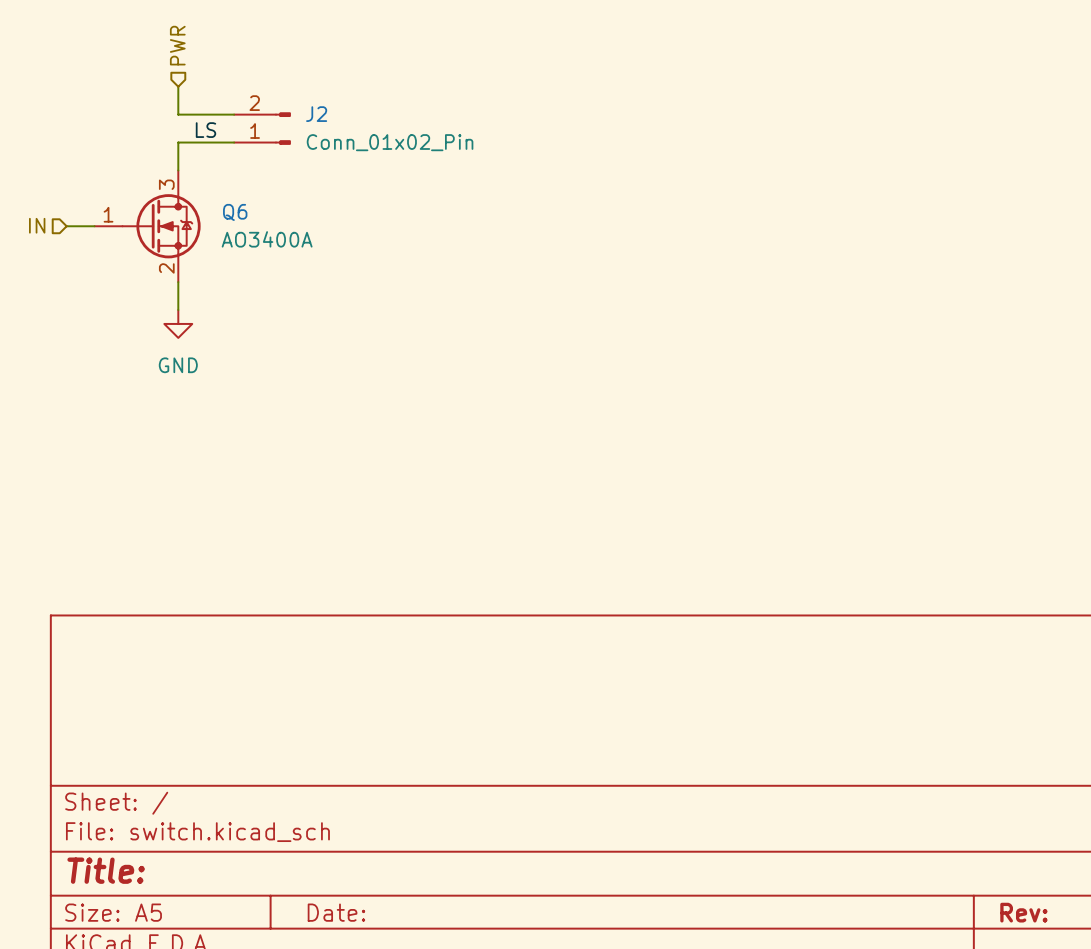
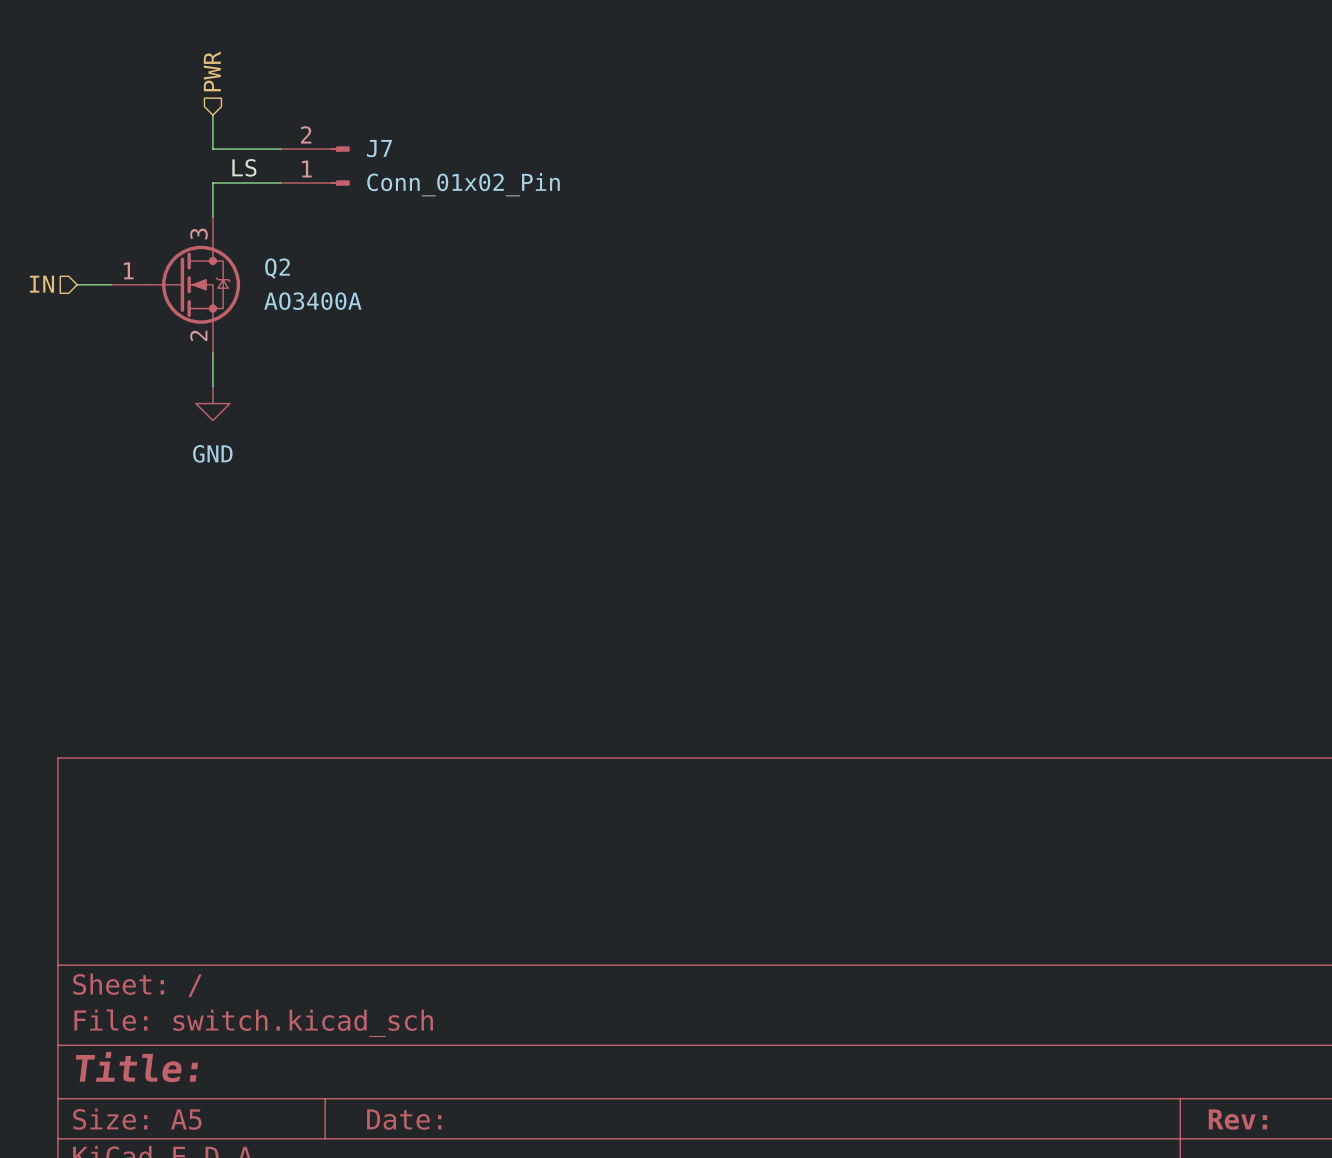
J2 name: J2 (316, 114) -> J7 (379, 148)
Q6 name: Q6 (235, 212) -> Q2 (277, 268)

